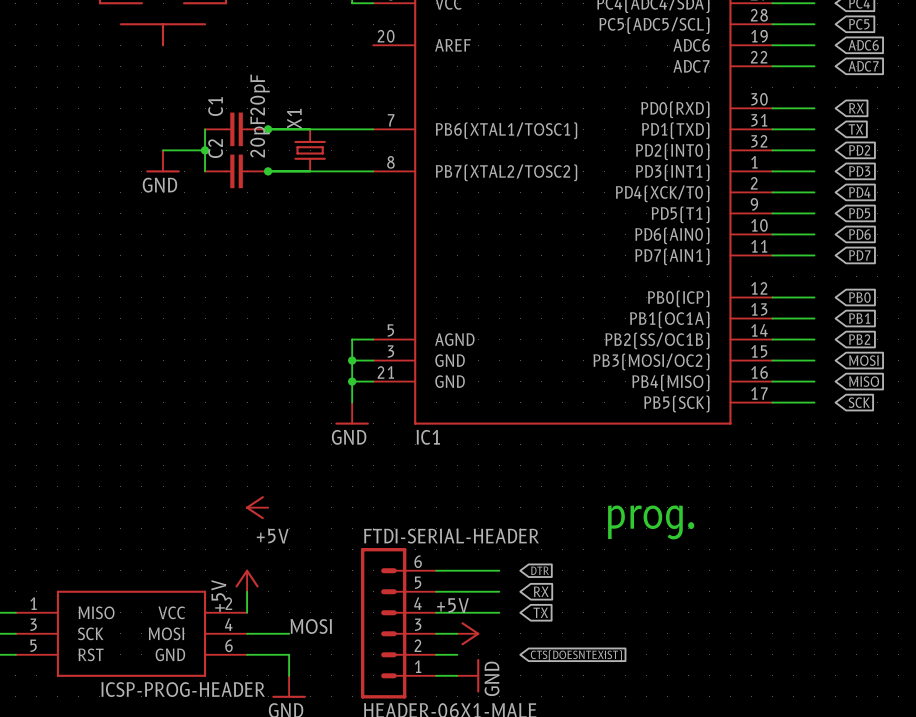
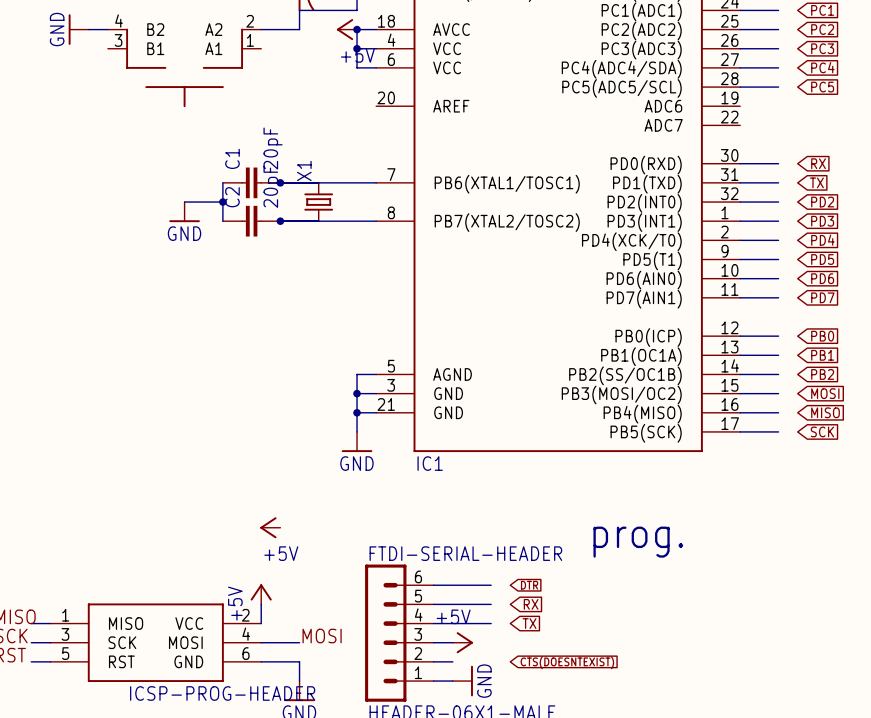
wire: (772, 45) (814, 45) -> none
global label: ADC6 (863, 45) -> none
wire: (772, 66) (814, 66) -> none
global label: ADC7 (863, 66) -> none

